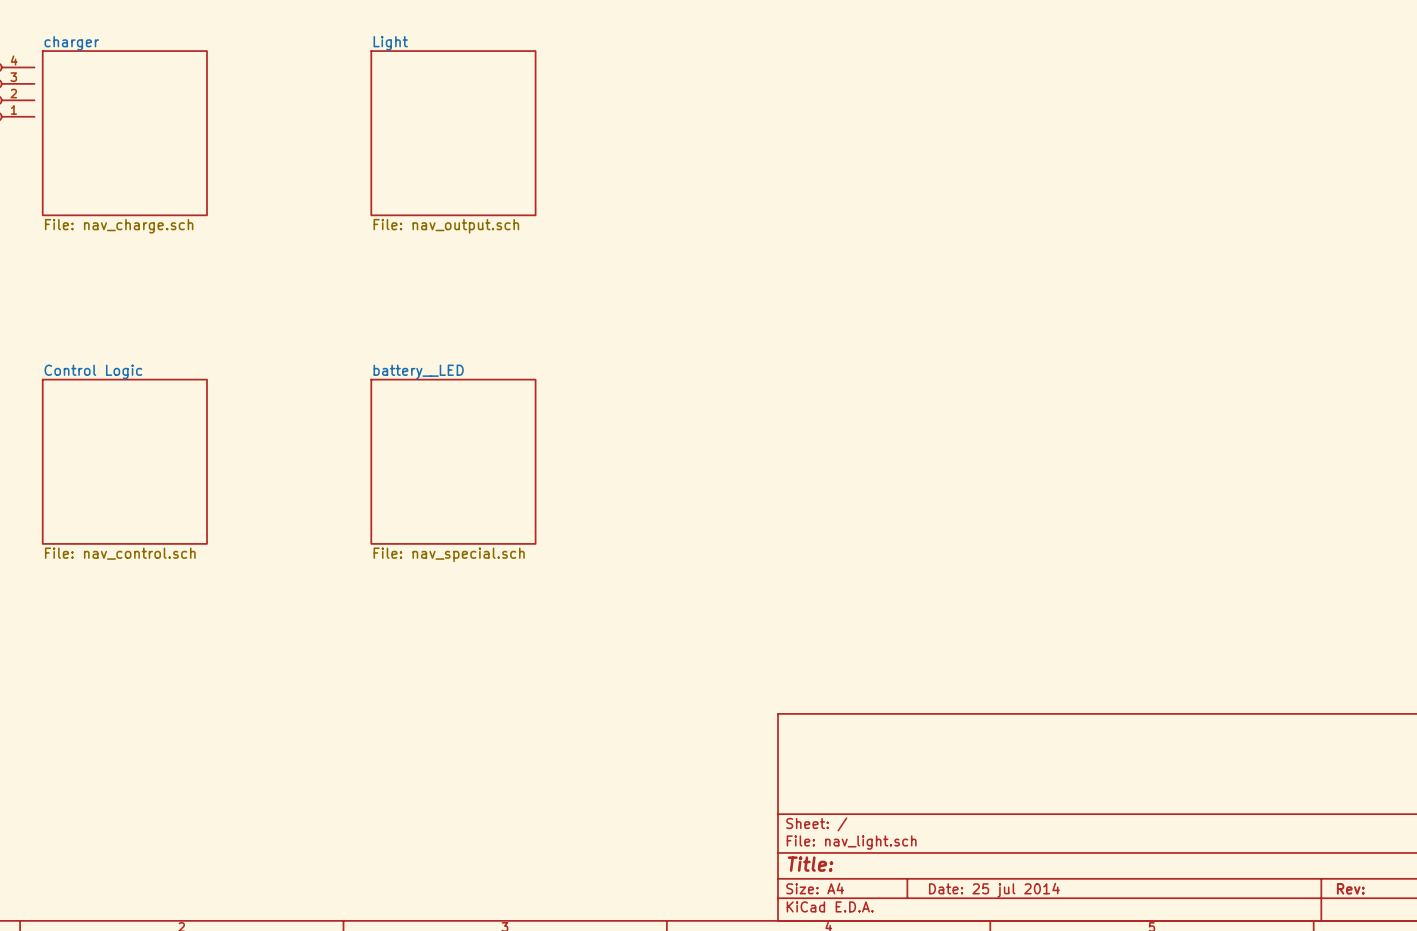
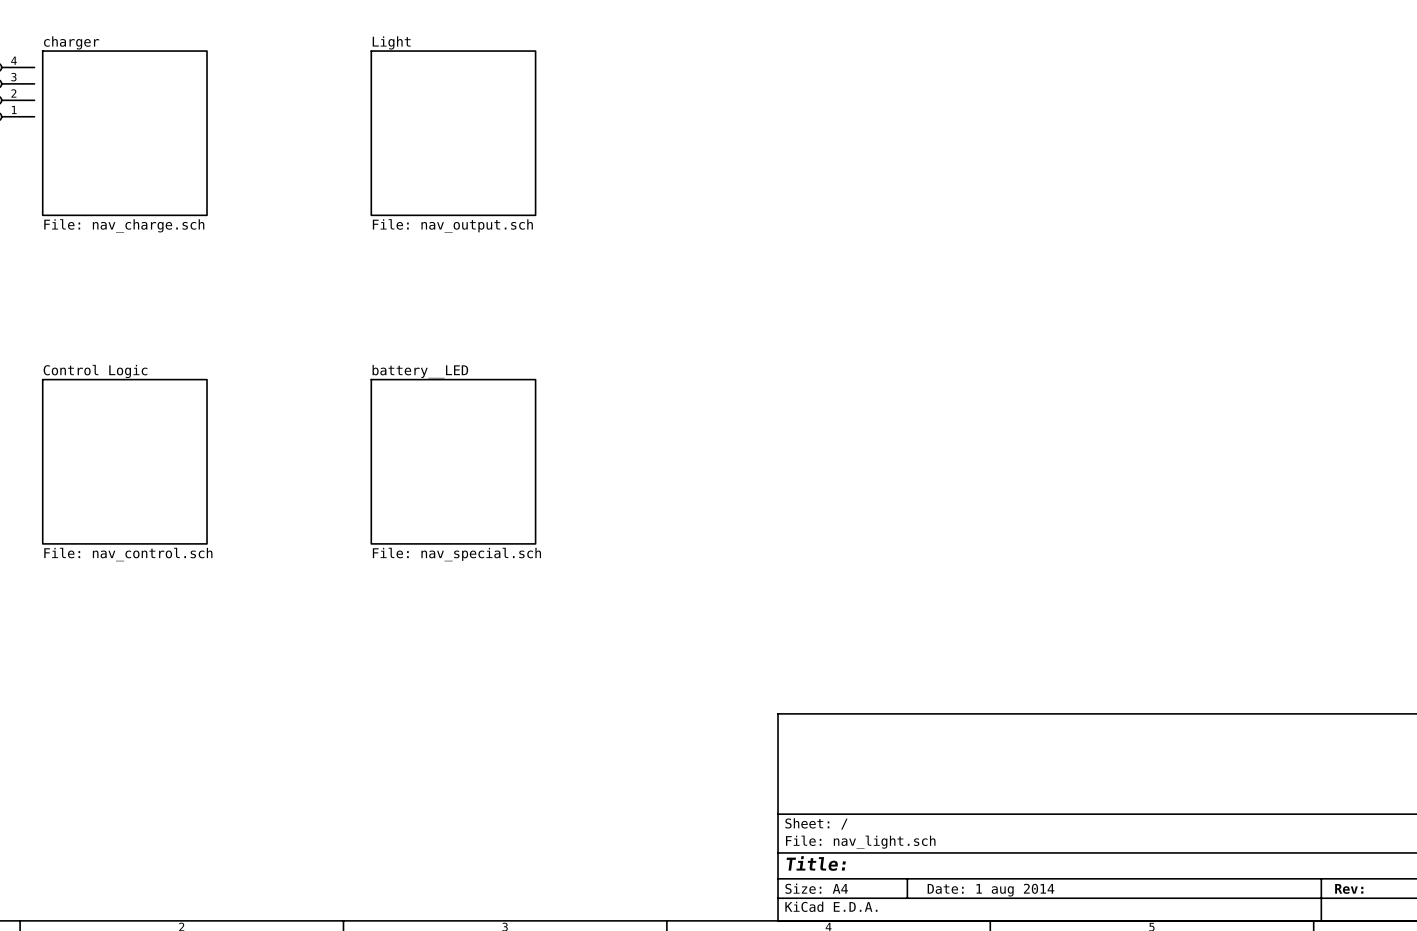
title block: Date: 25 jul 2014 (994, 890) -> Date: 1 aug 2014 (990, 890)

